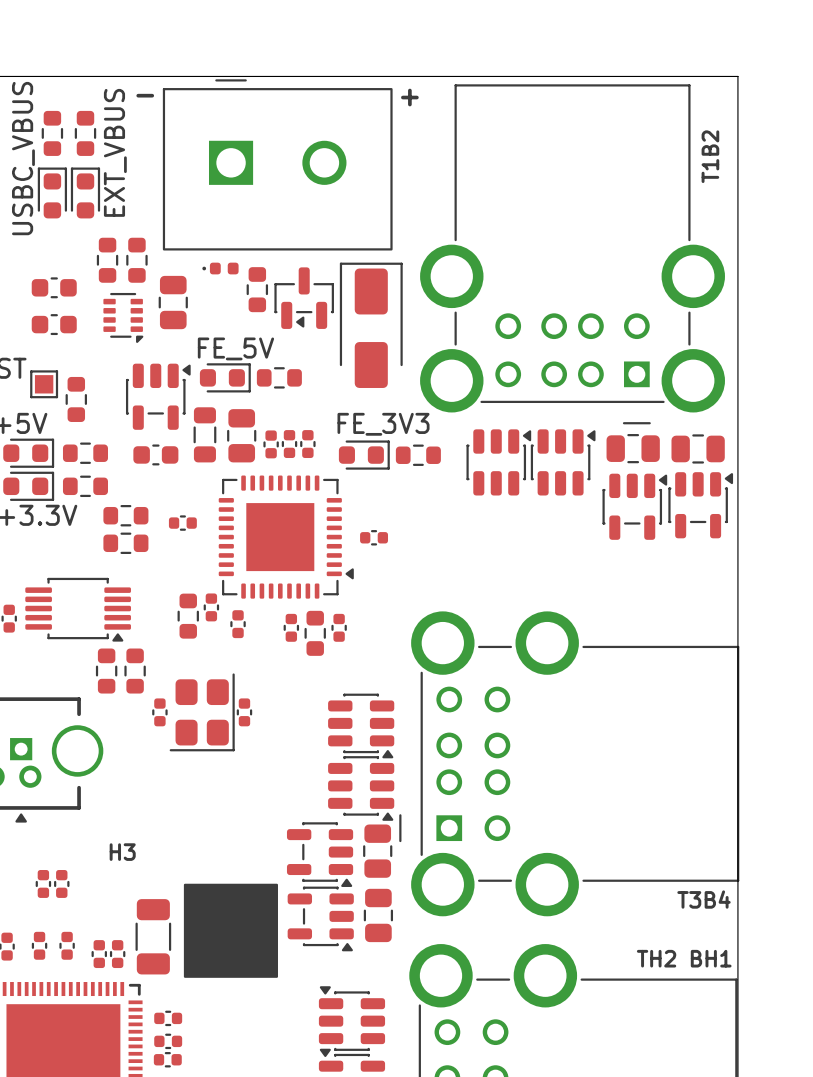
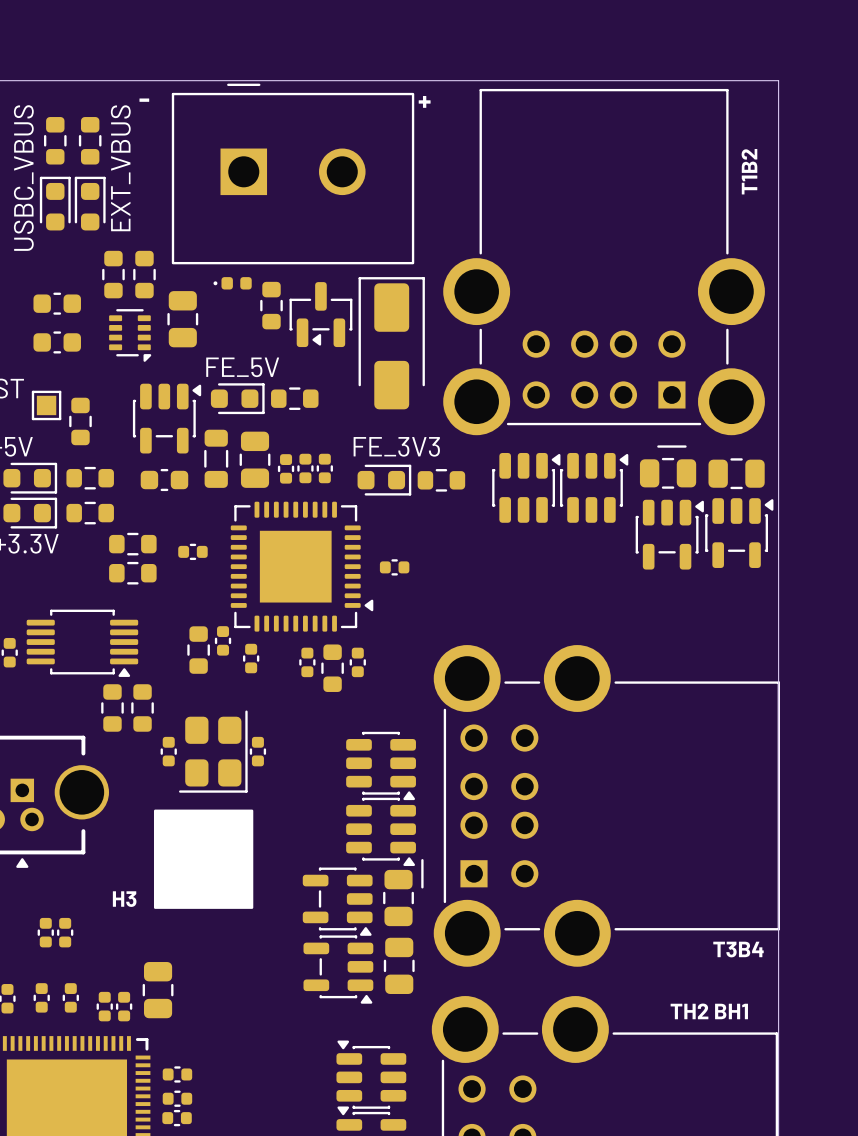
part footprint: [135, 899, 172, 975] -> [142, 962, 174, 1019]
drawing position: (230, 930) -> (203, 859)

